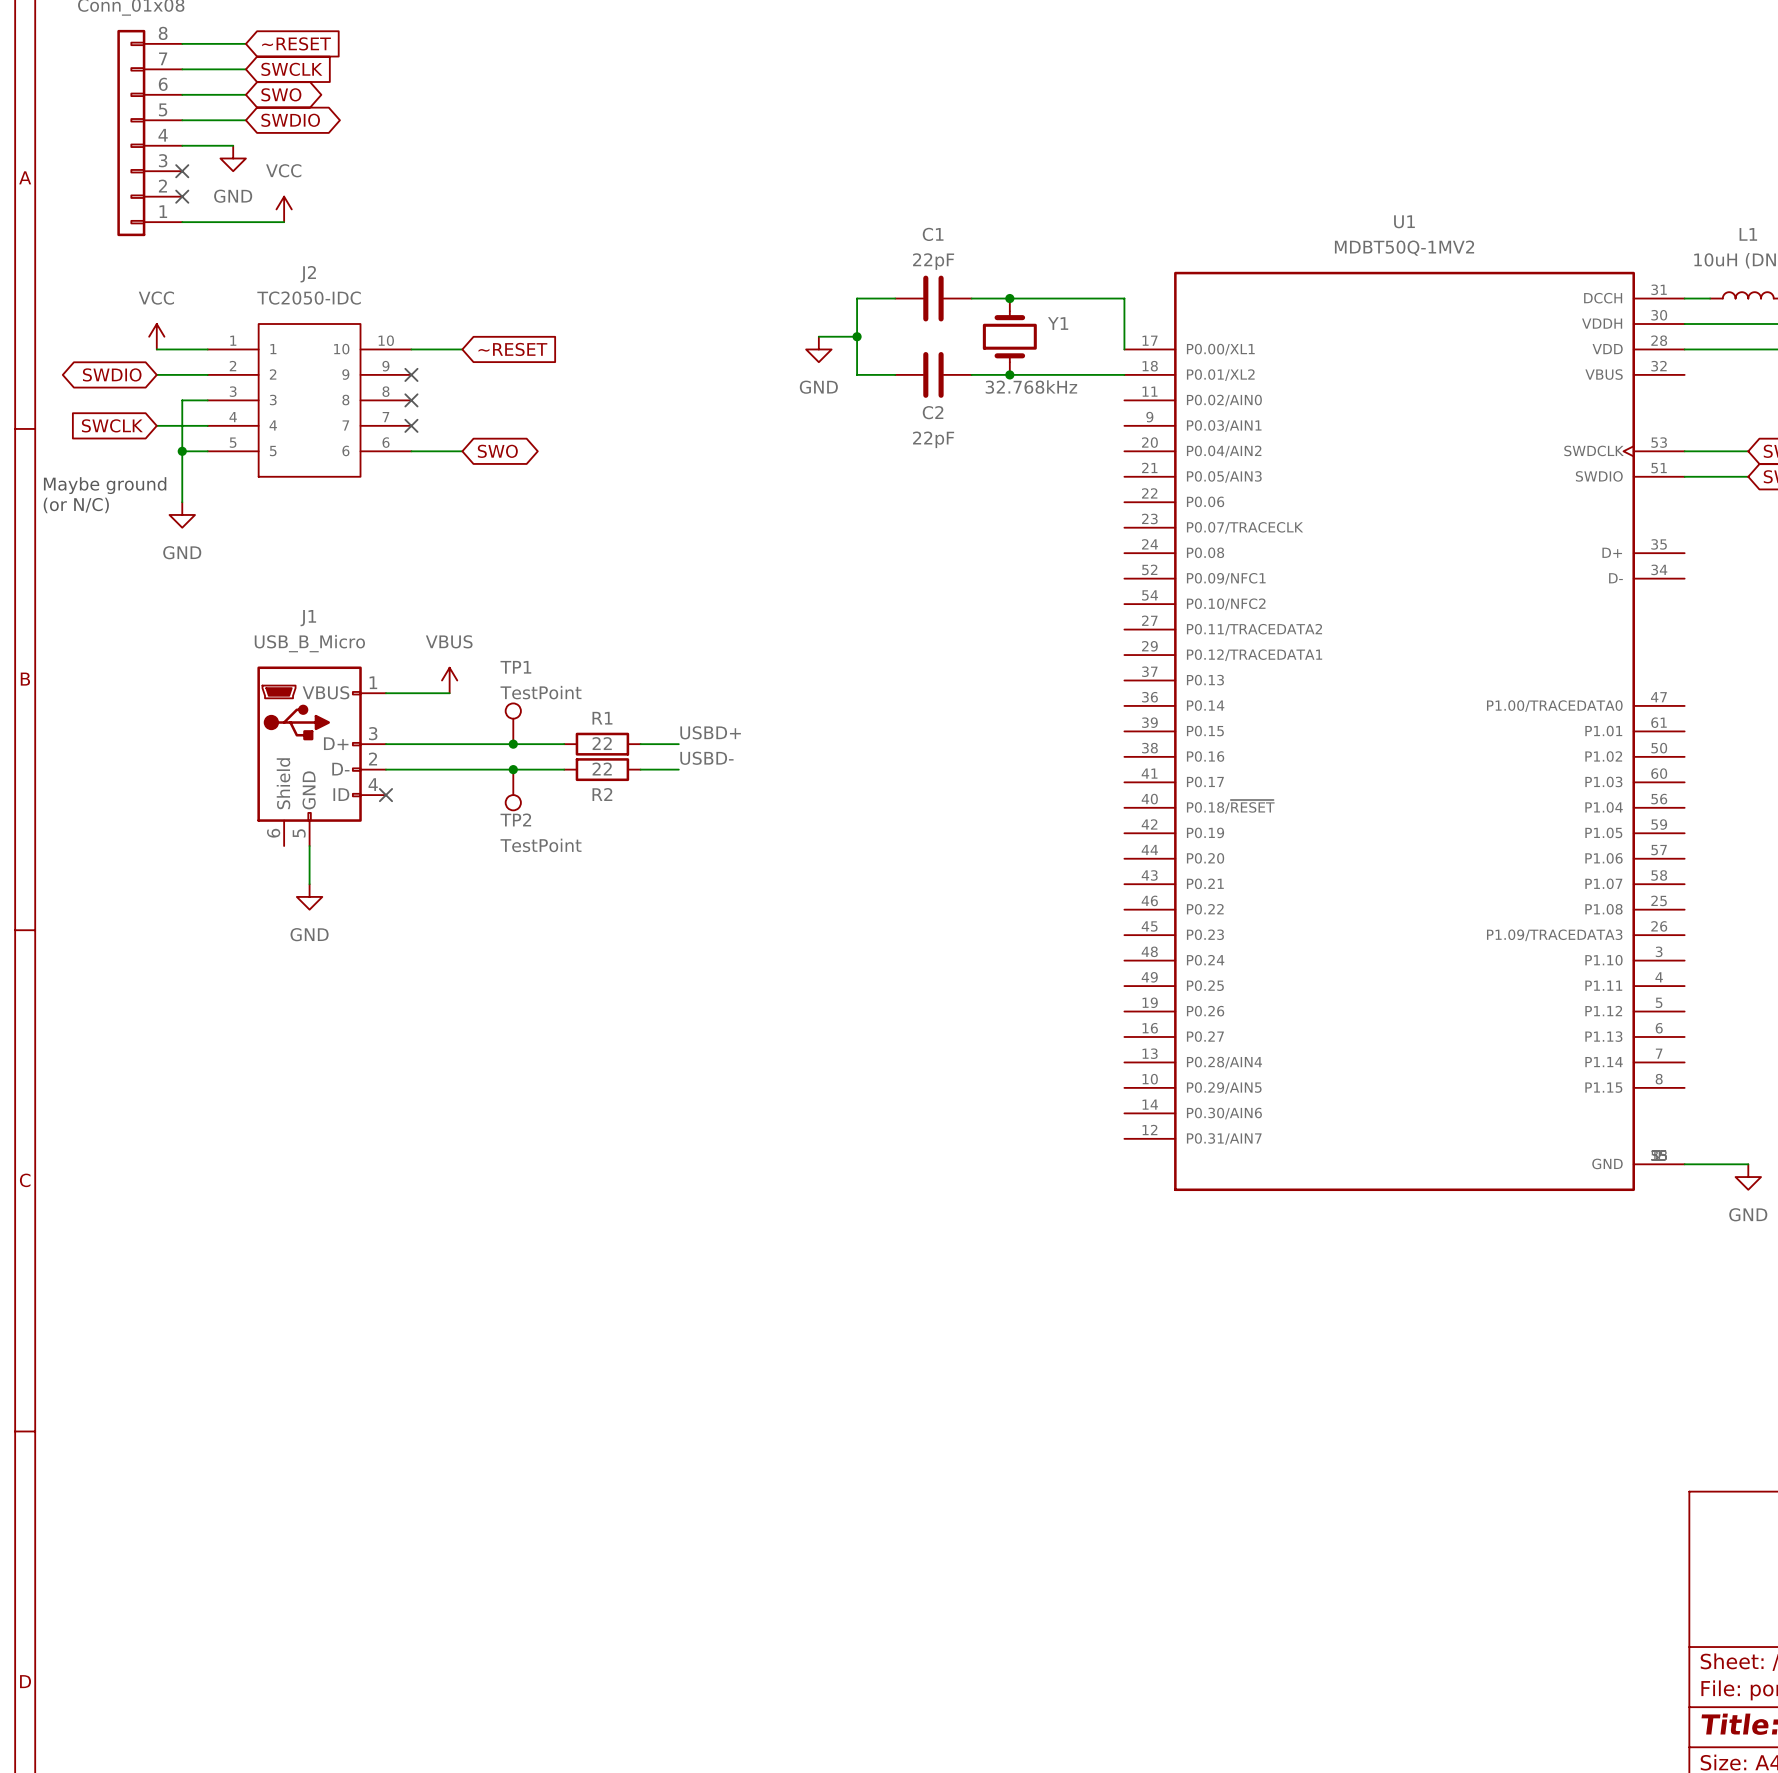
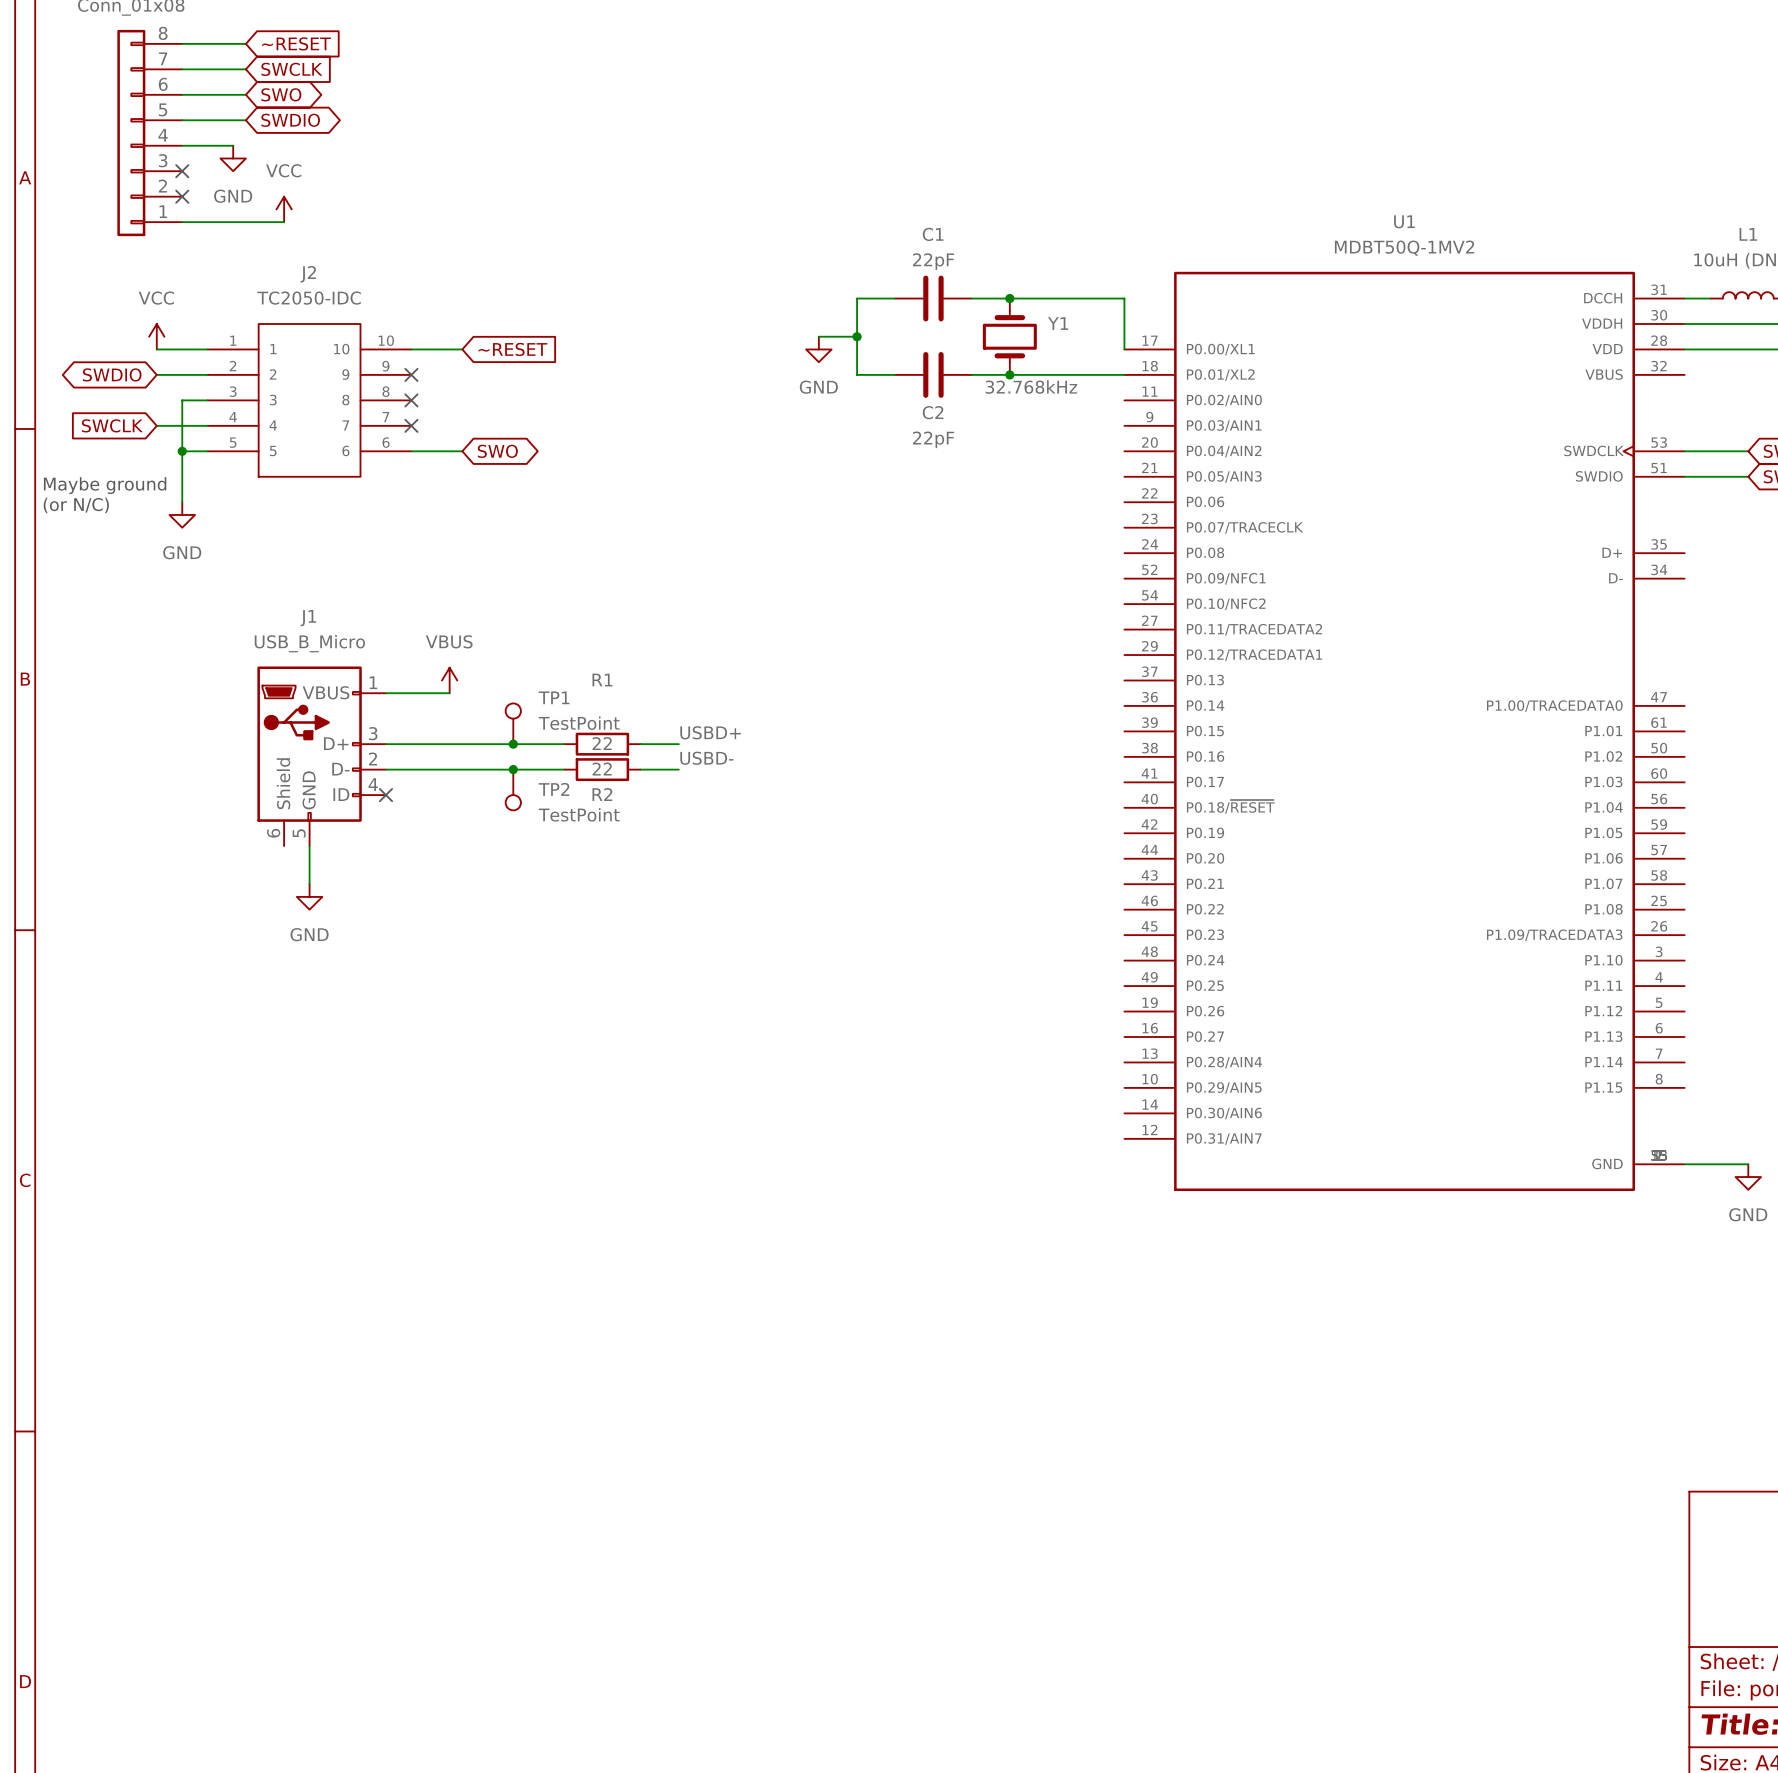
TP1 name position: TP1 (515, 667) -> TP1 (554, 697)
TP1 value position: TestPoint (541, 692) -> TestPoint (579, 723)
R1 name position: R1 (602, 718) -> R1 (602, 680)
TP2 name position: TP2 (515, 819) -> TP2 (554, 789)
TP2 value position: TestPoint (541, 845) -> TestPoint (579, 814)

